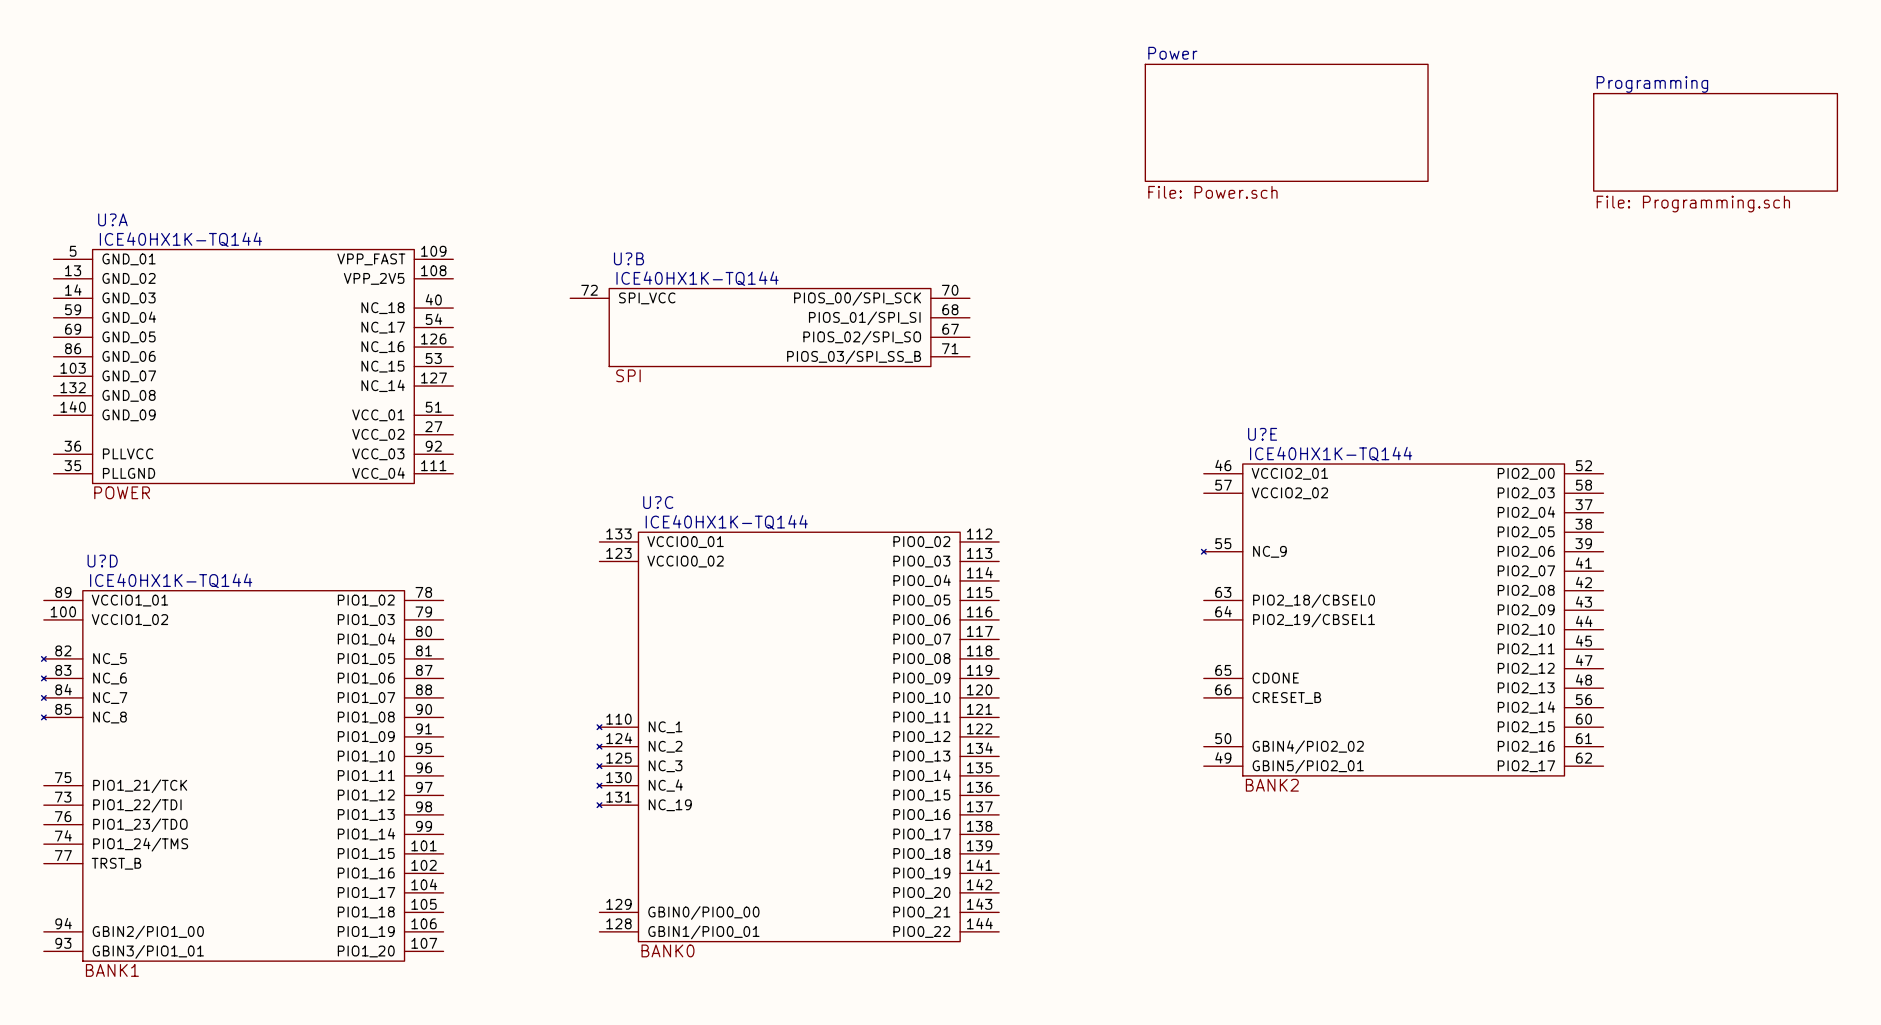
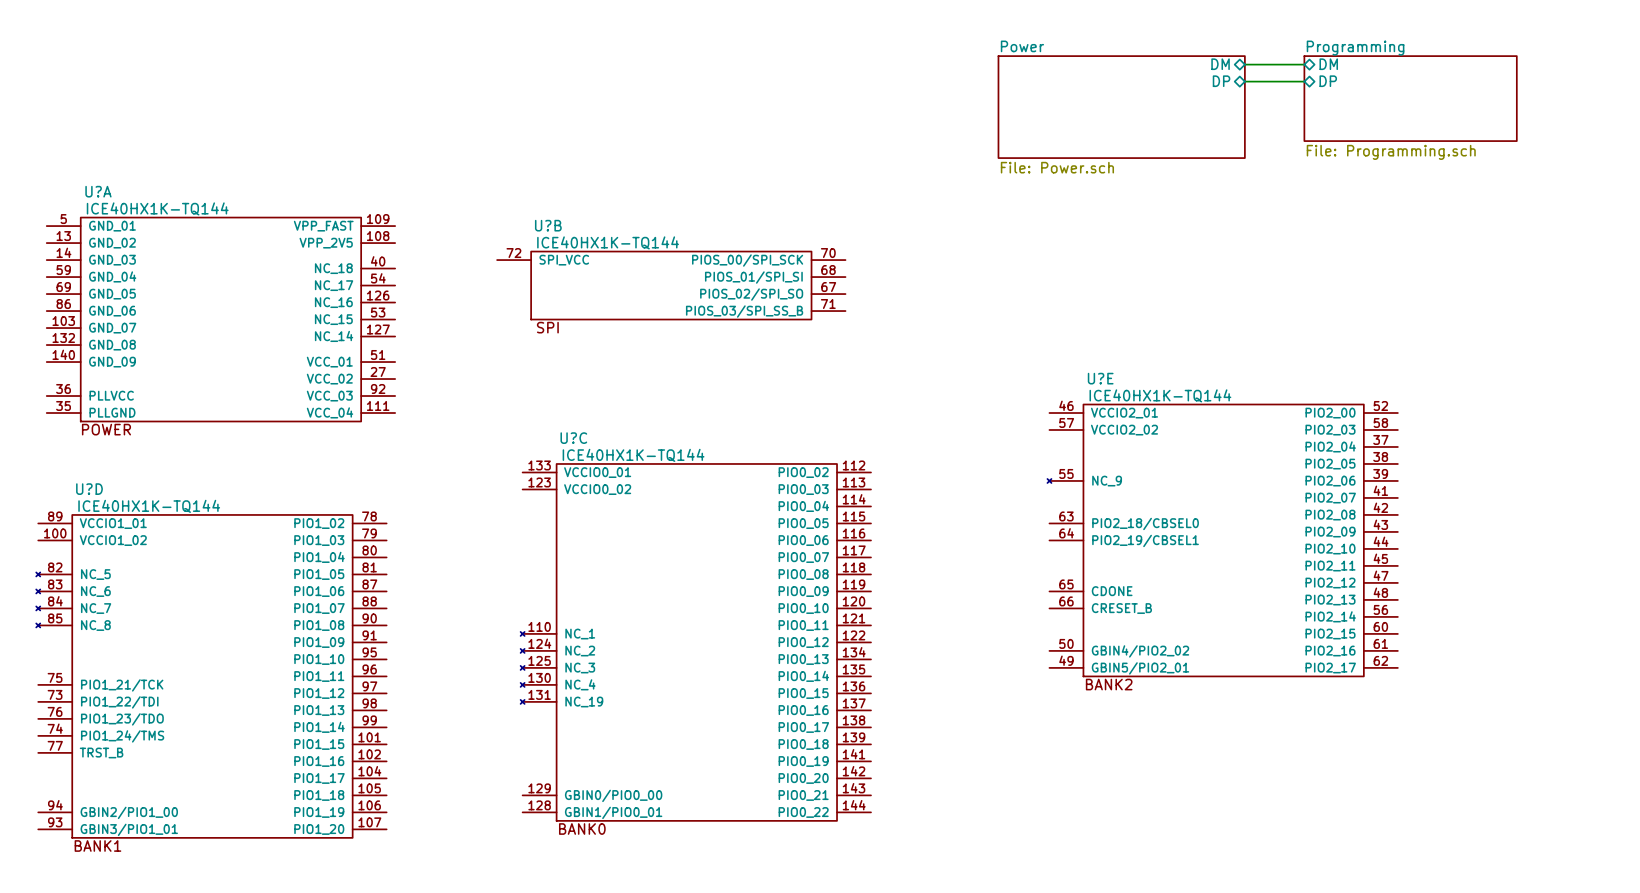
sheet pin: none -> DM (1220, 64)
sheet pin: none -> DM (1328, 64)
wire: none -> (1244, 64) (1304, 64)
sheet pin: none -> DP (1221, 81)
wire: none -> (1244, 81) (1304, 81)
sheet pin: none -> DP (1328, 81)
sheet Programming position: (1715, 142) -> (1410, 98)

